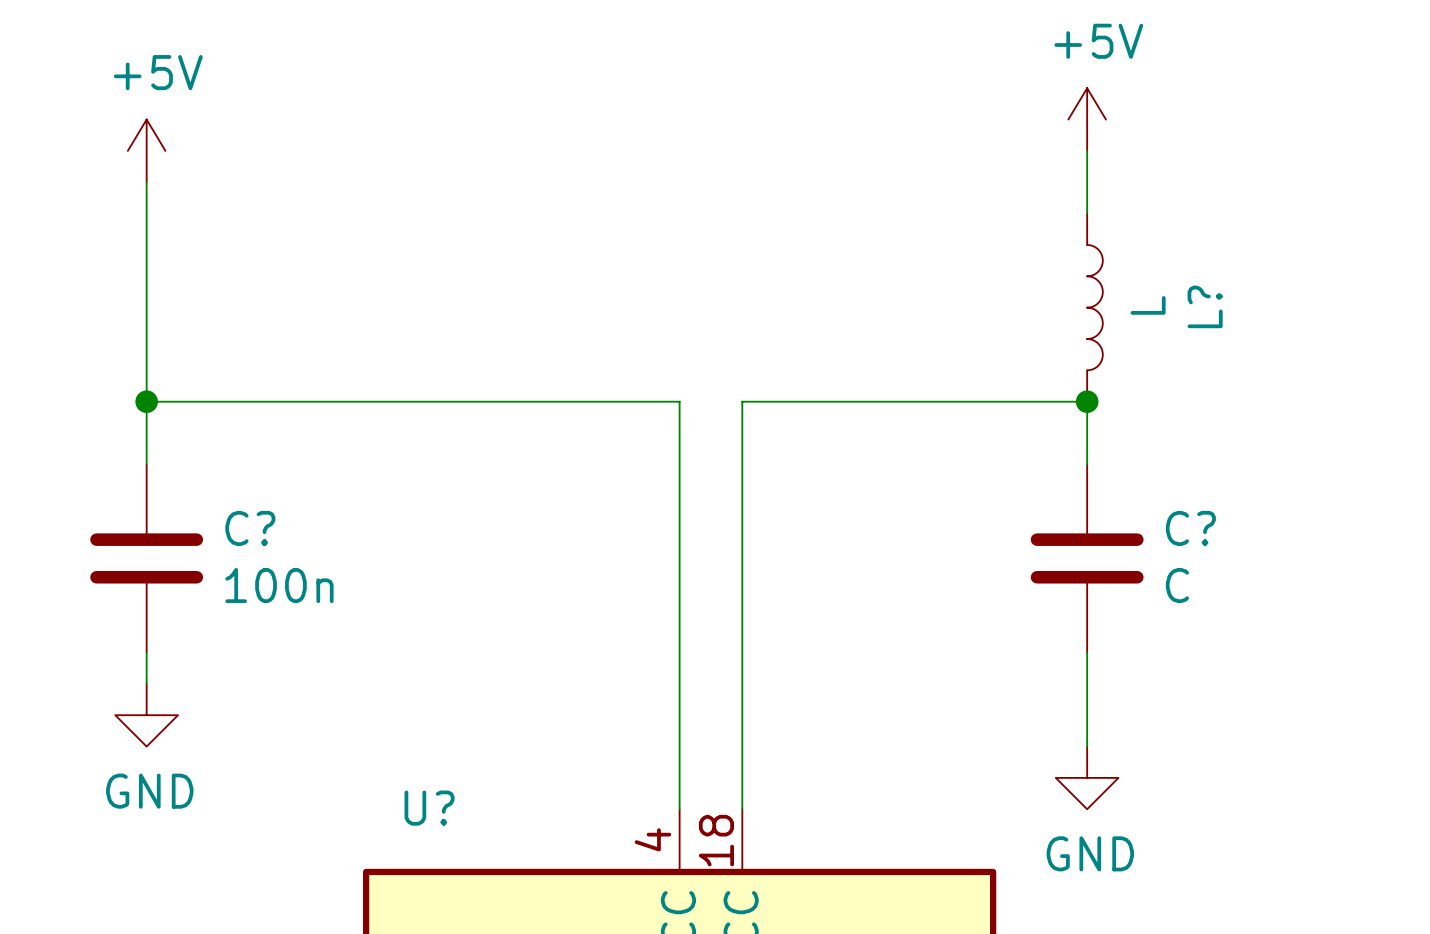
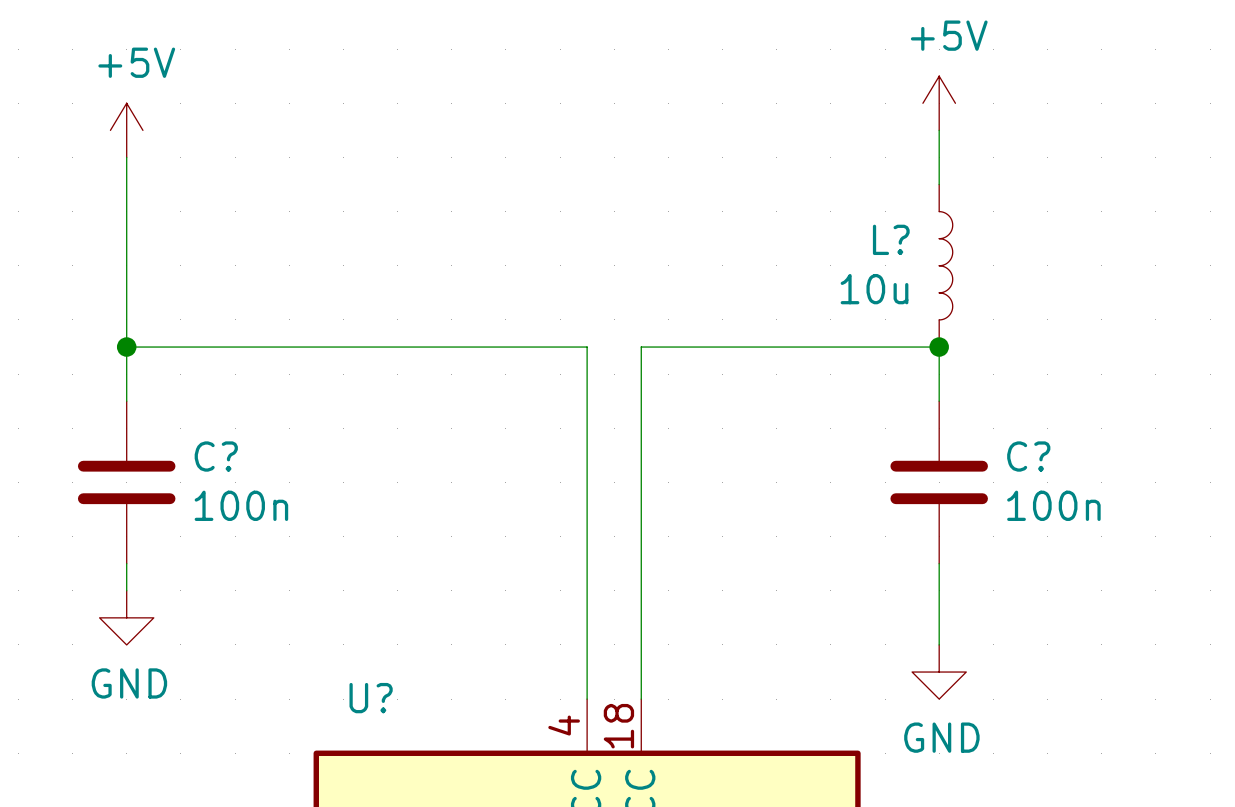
L? value: L (1148, 305) -> 10u (874, 289)
L? name rotation: 0° (1205, 306) -> 90° clockwise (891, 239)
L? name position: L? (1205, 306) -> L? (891, 239)
C? value: C (1177, 585) -> 100n (1053, 505)

